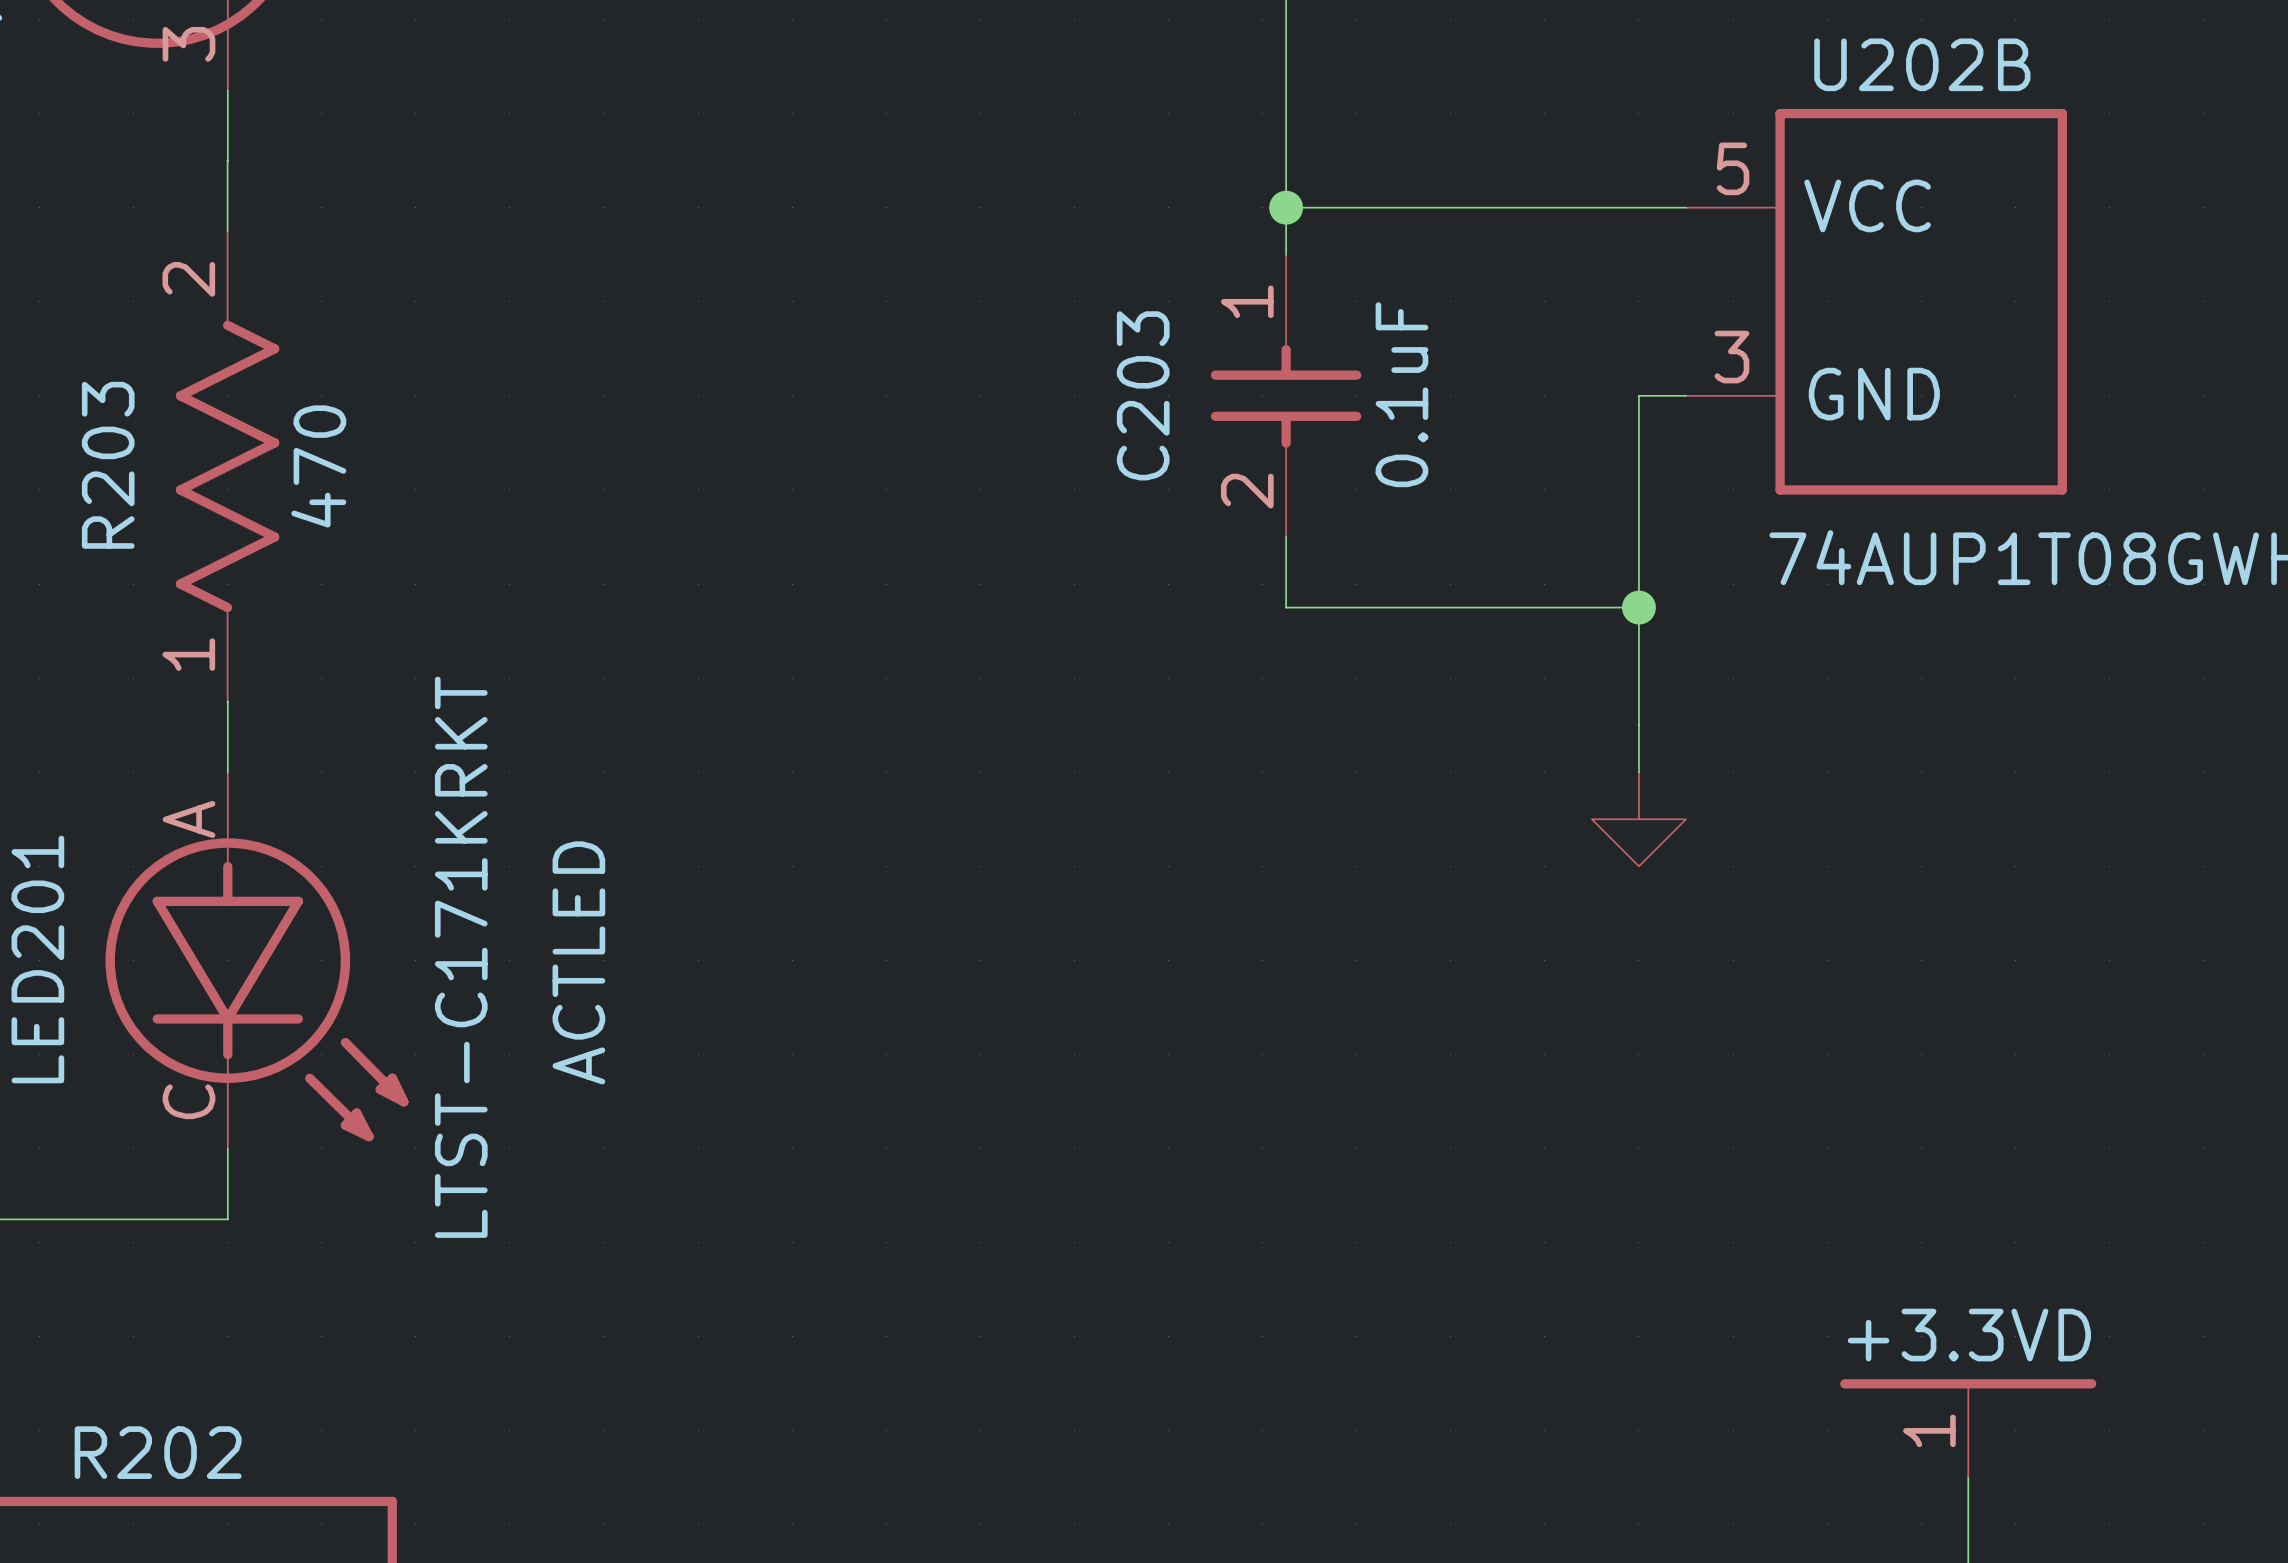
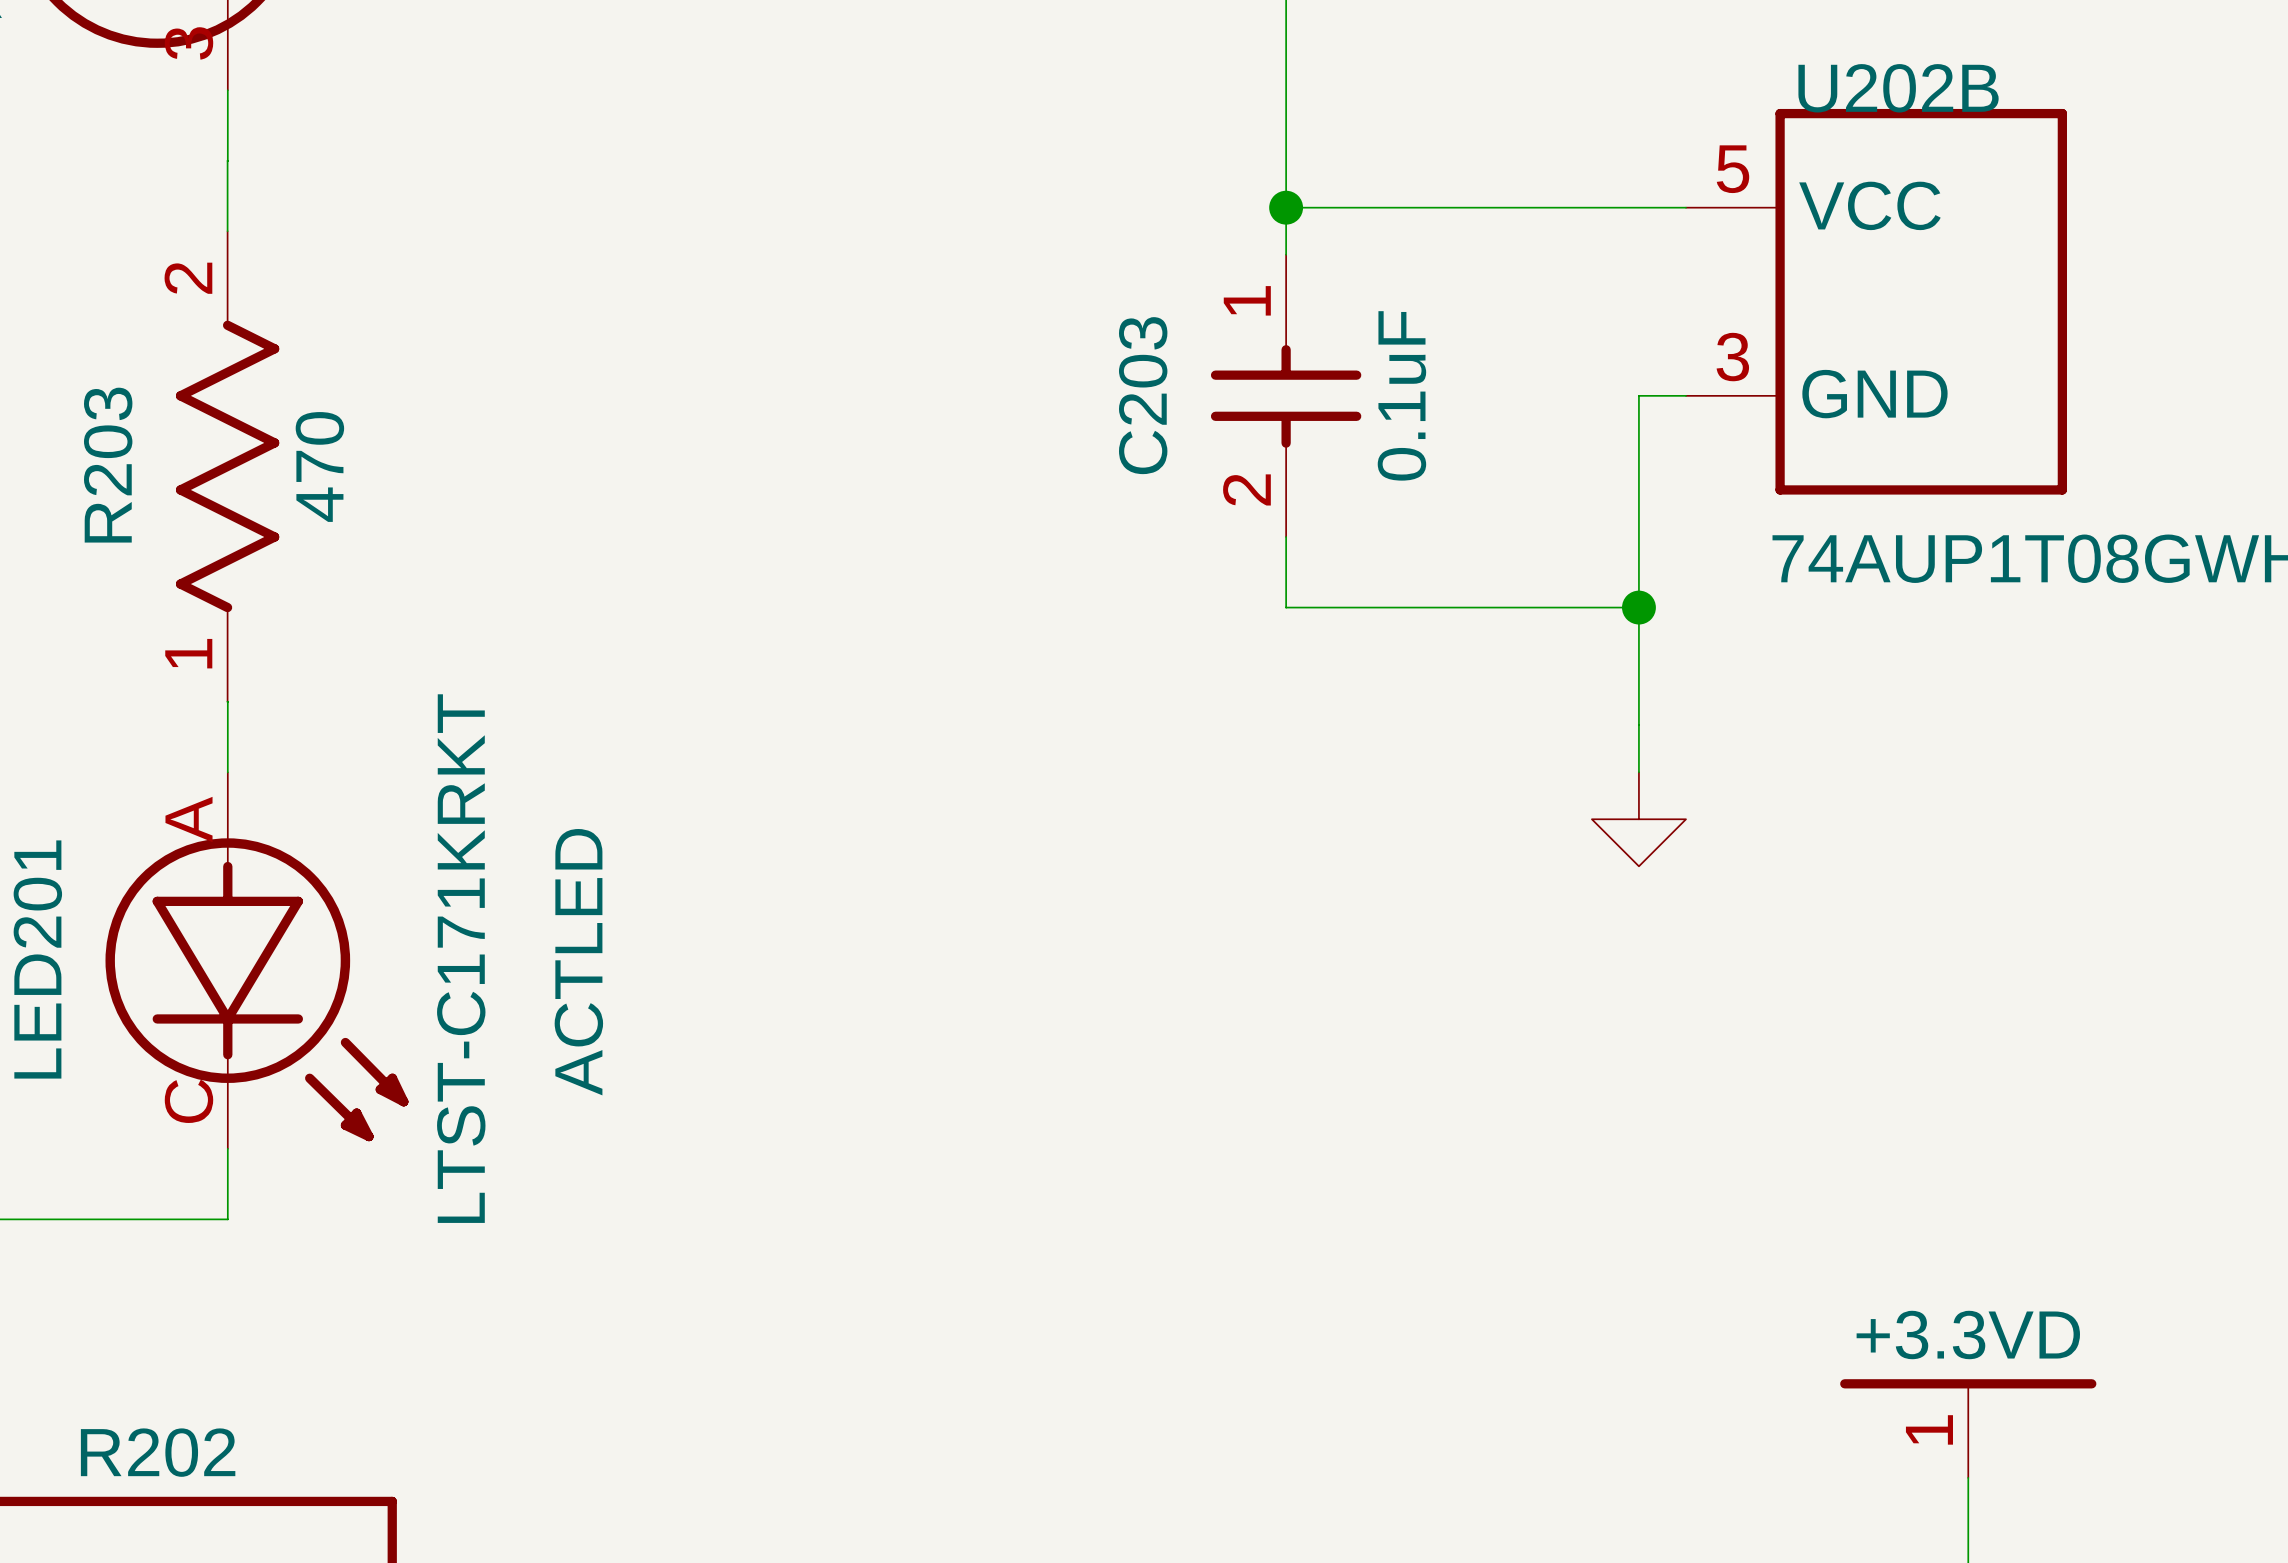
U202B name position: U202B (1922, 64) -> U202B (1898, 88)

